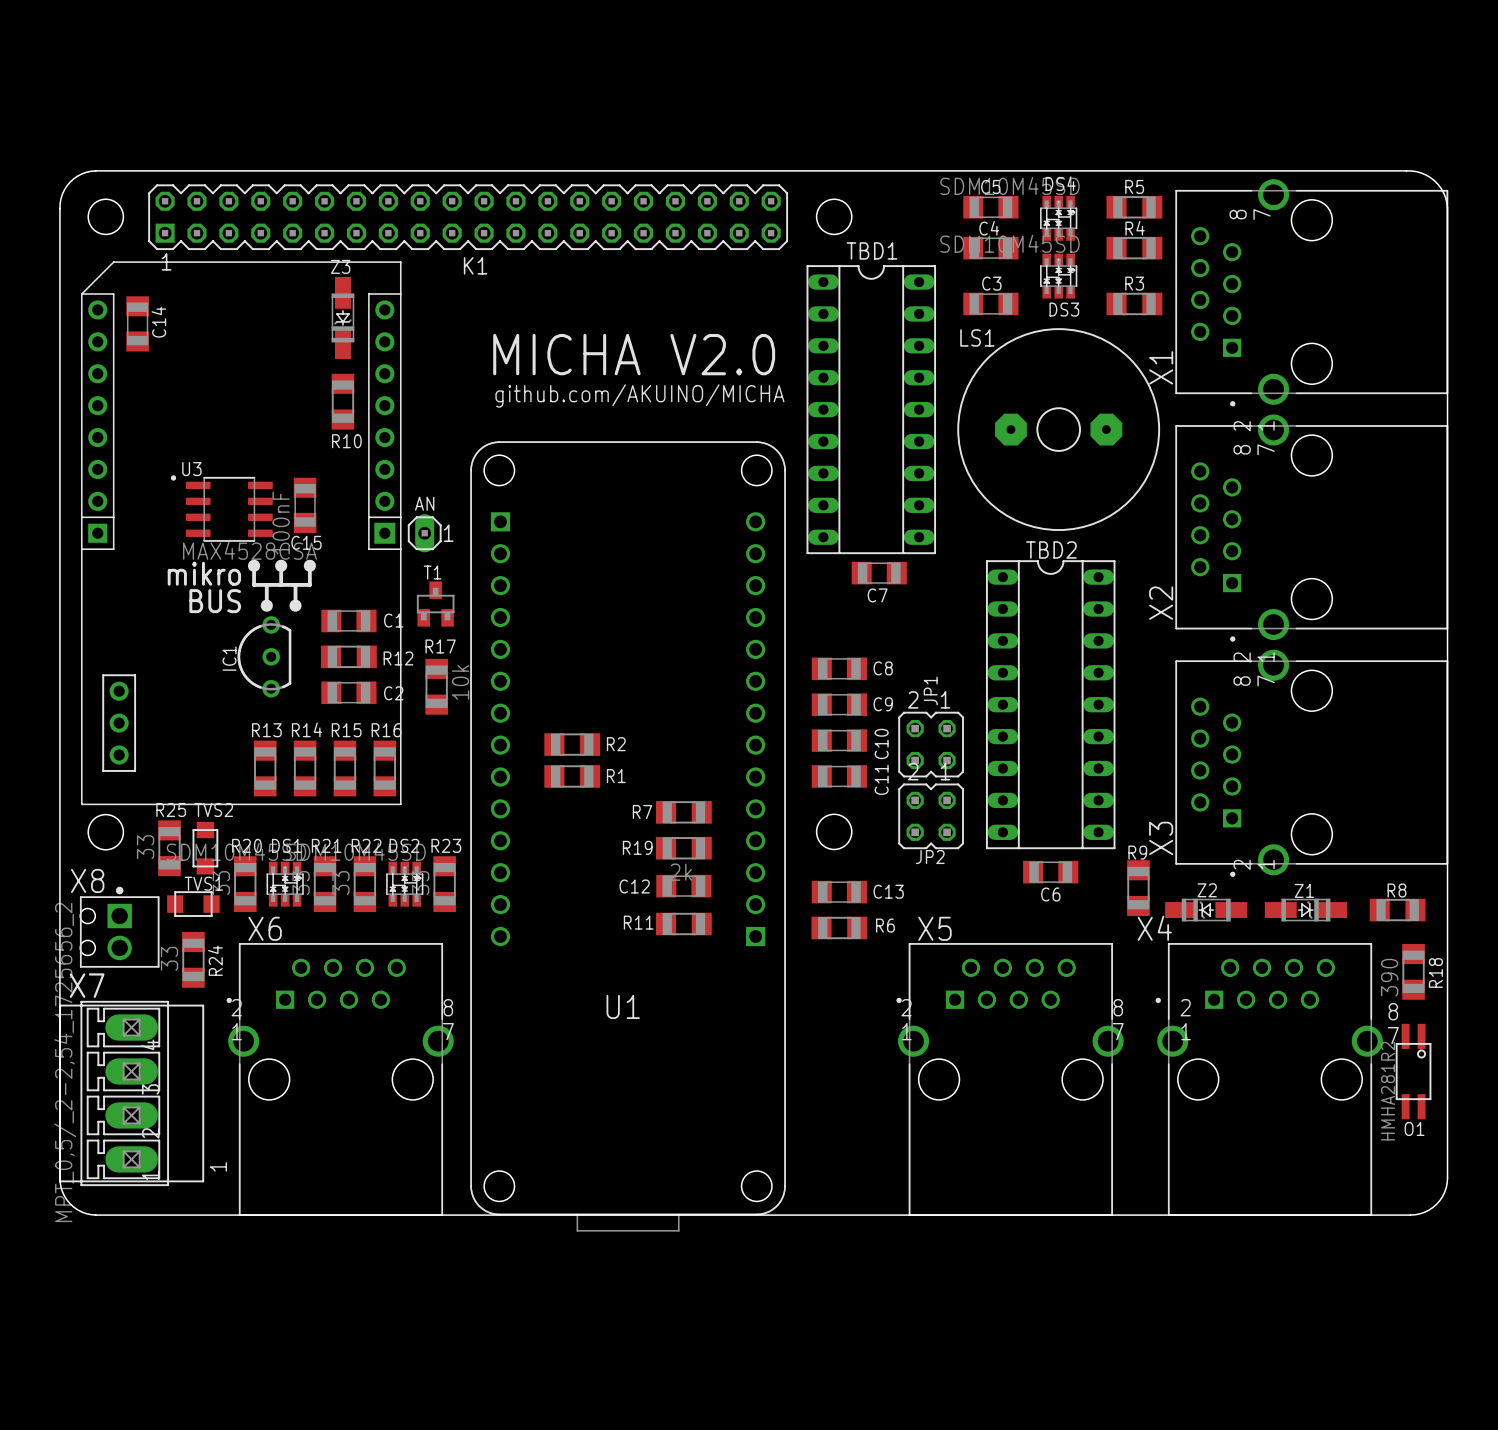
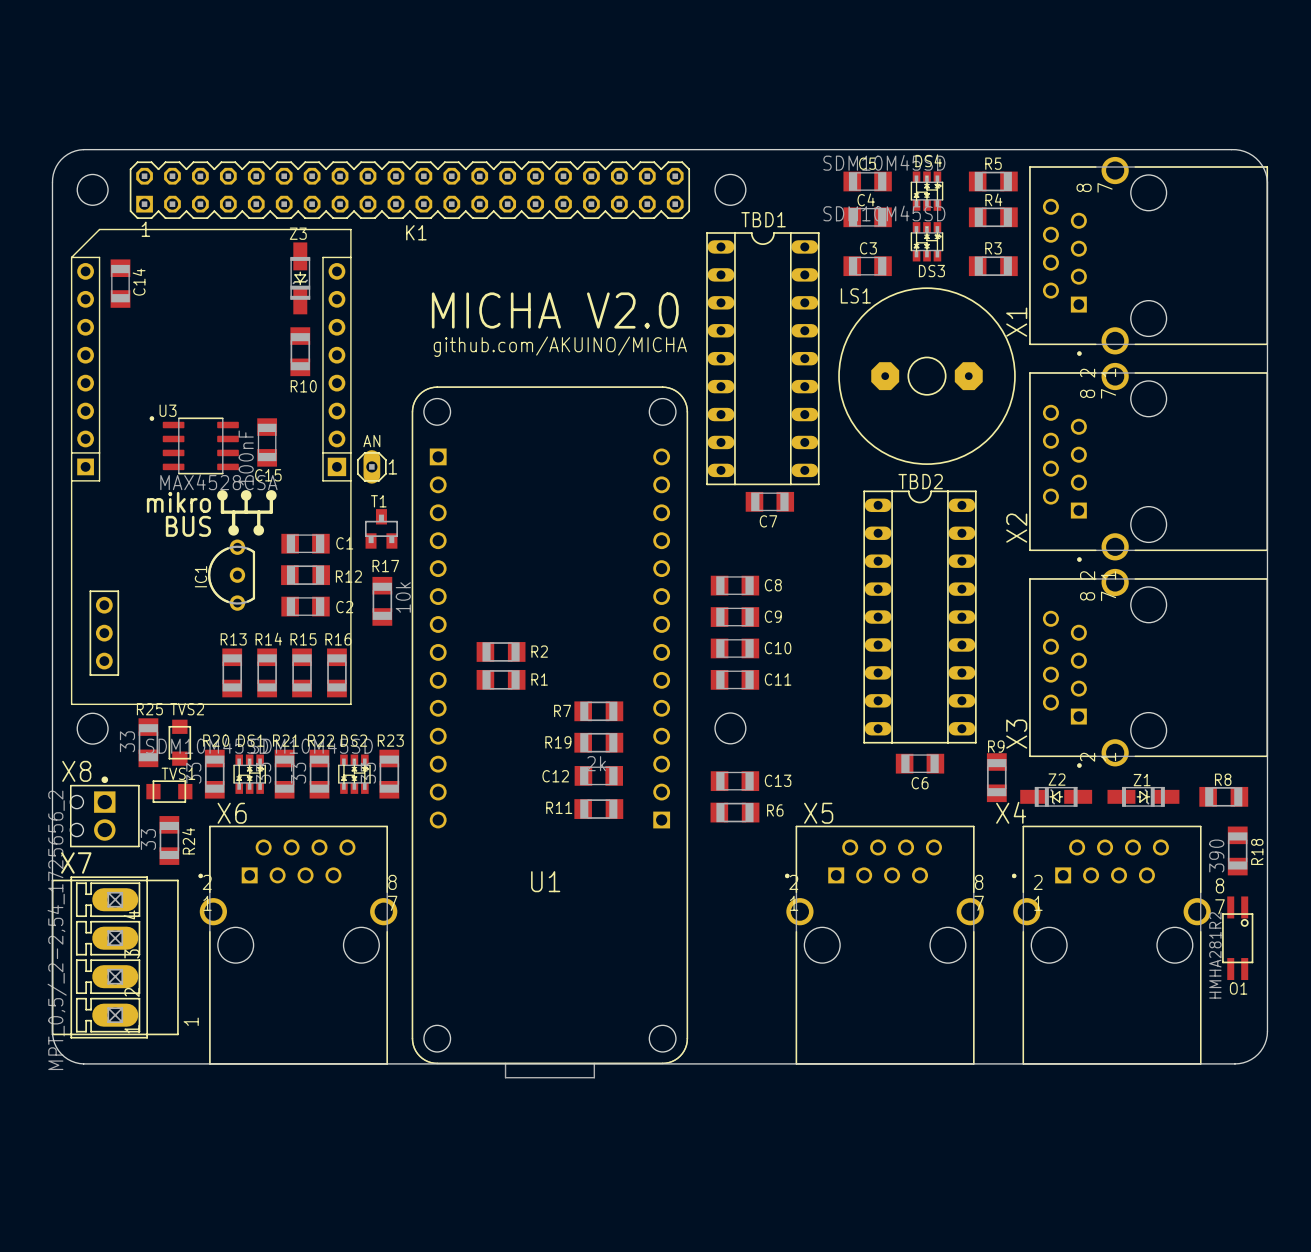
C10 name rotation: 0° (881, 743) -> 90° clockwise (778, 648)
JP1: (931, 744) -> none
C11 name rotation: 0° (881, 779) -> 90° clockwise (778, 679)
JP2: (931, 816) -> none

